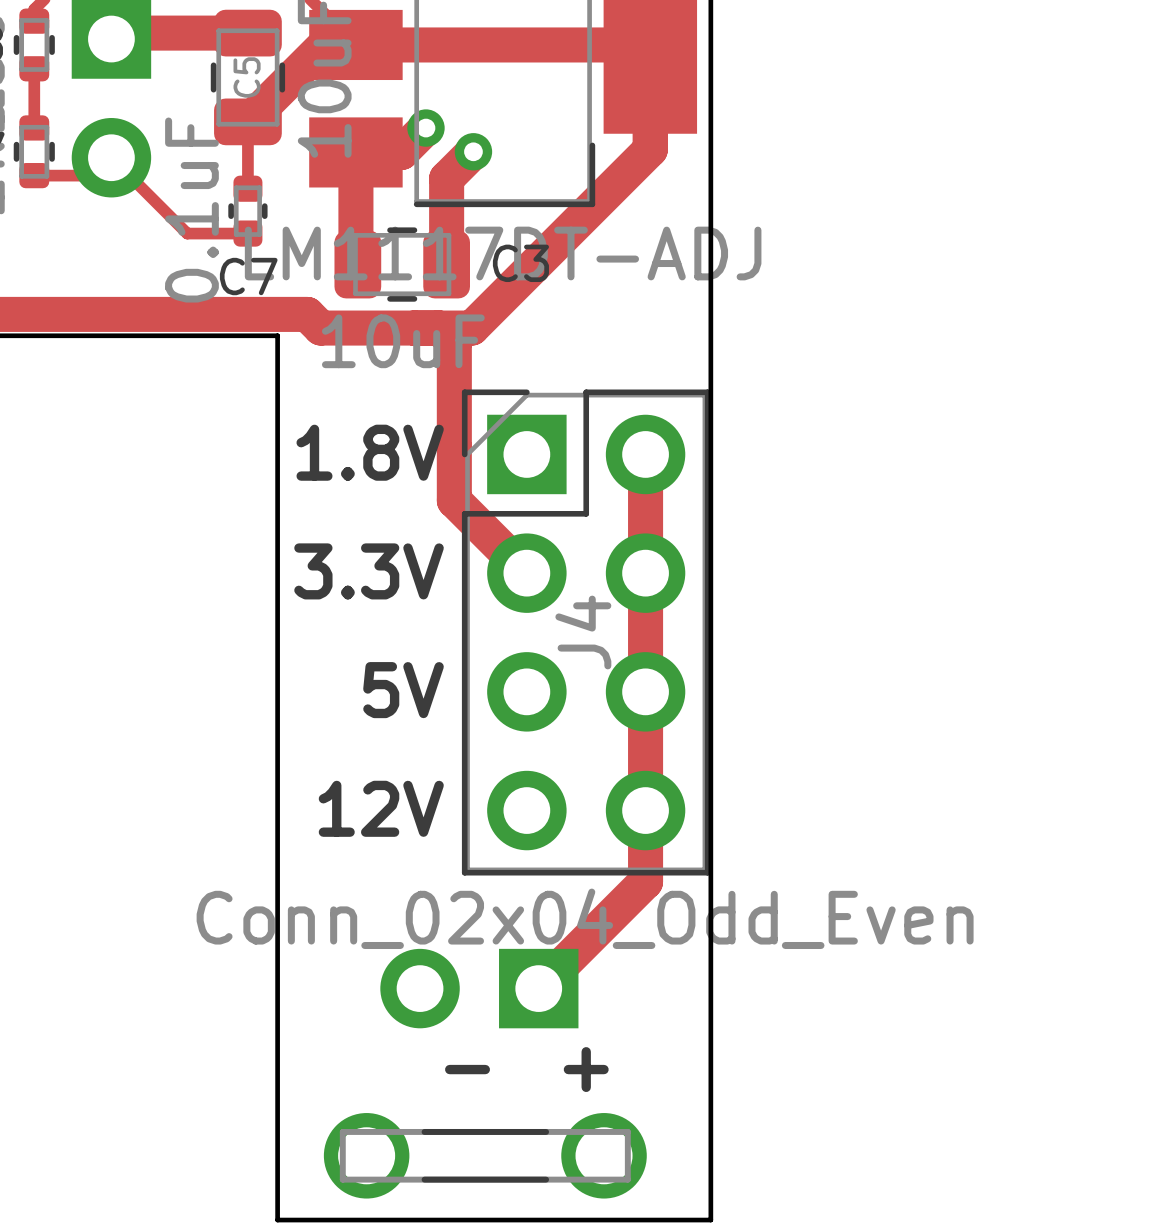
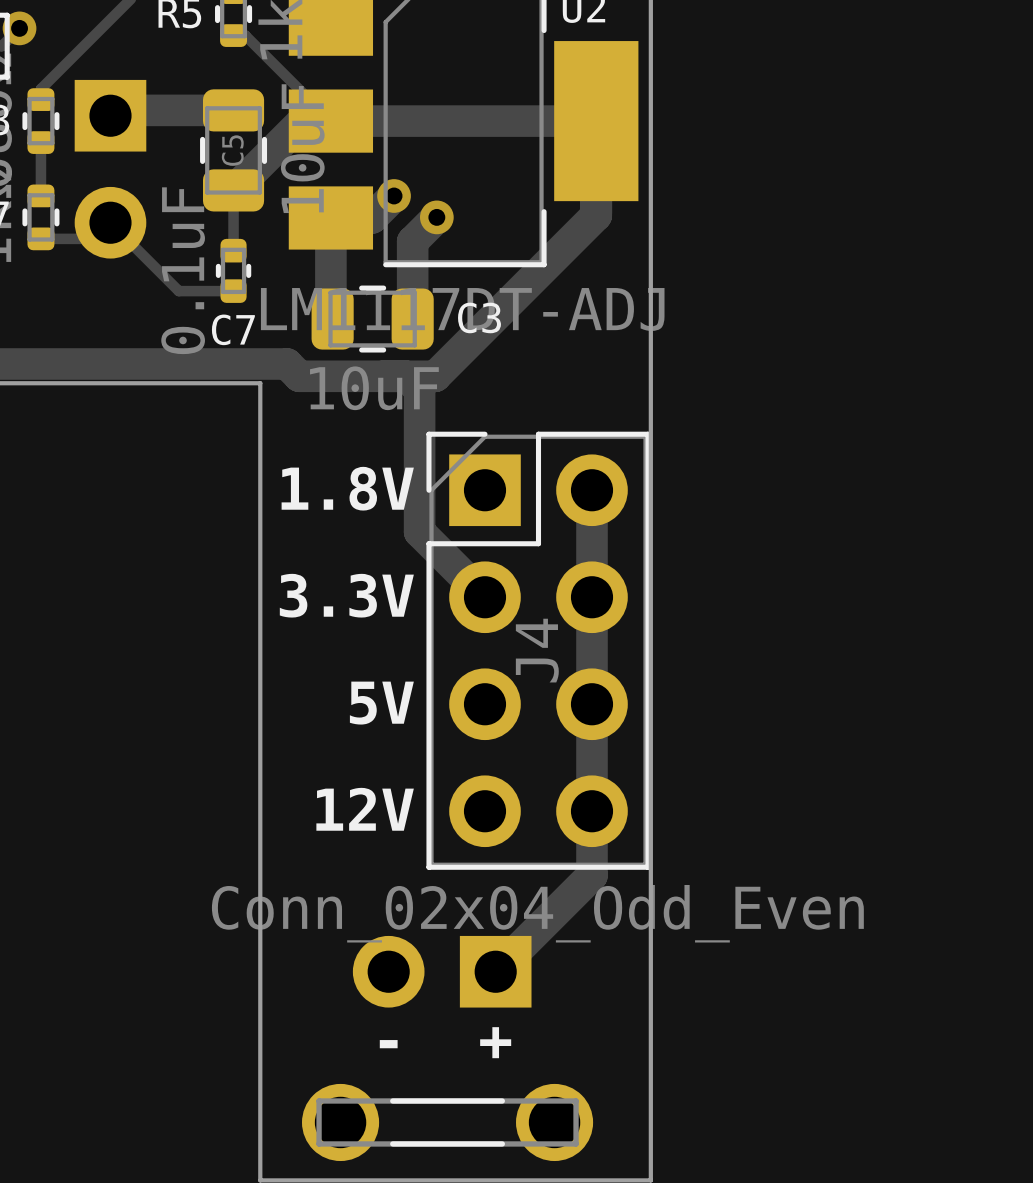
text position: - (467, 1069) -> - (388, 1044)
text position: + (586, 1069) -> + (495, 1042)

